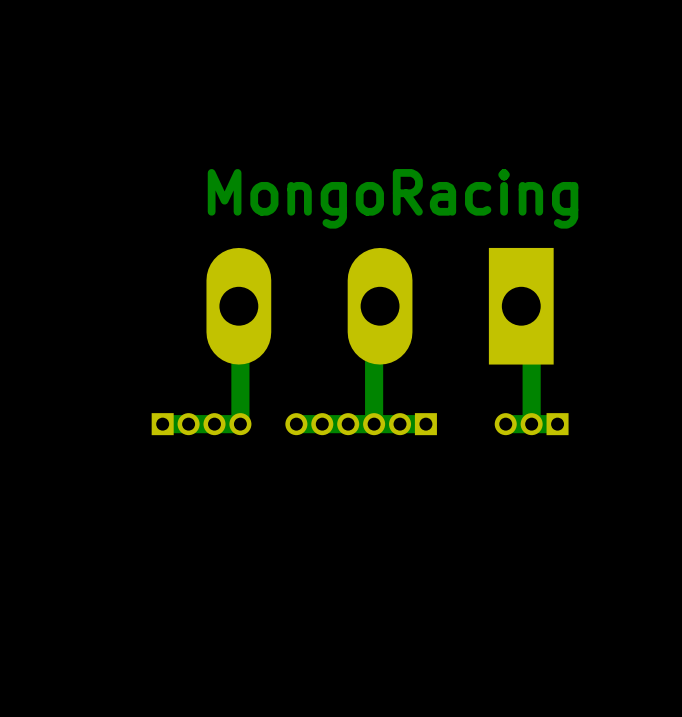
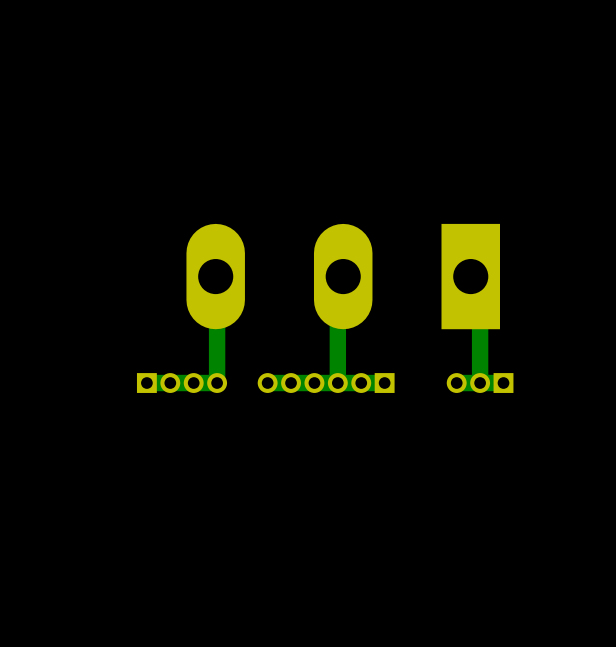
text: MongoRacing (393, 198) -> none

